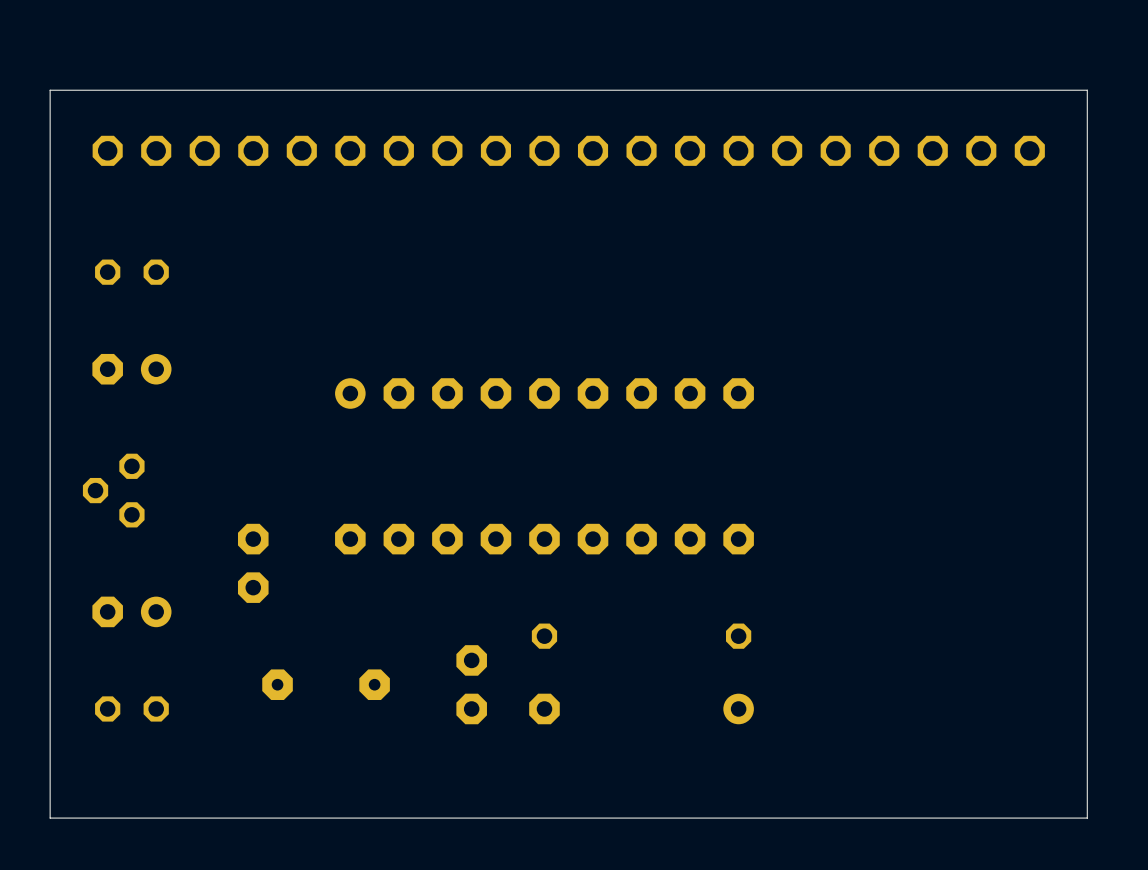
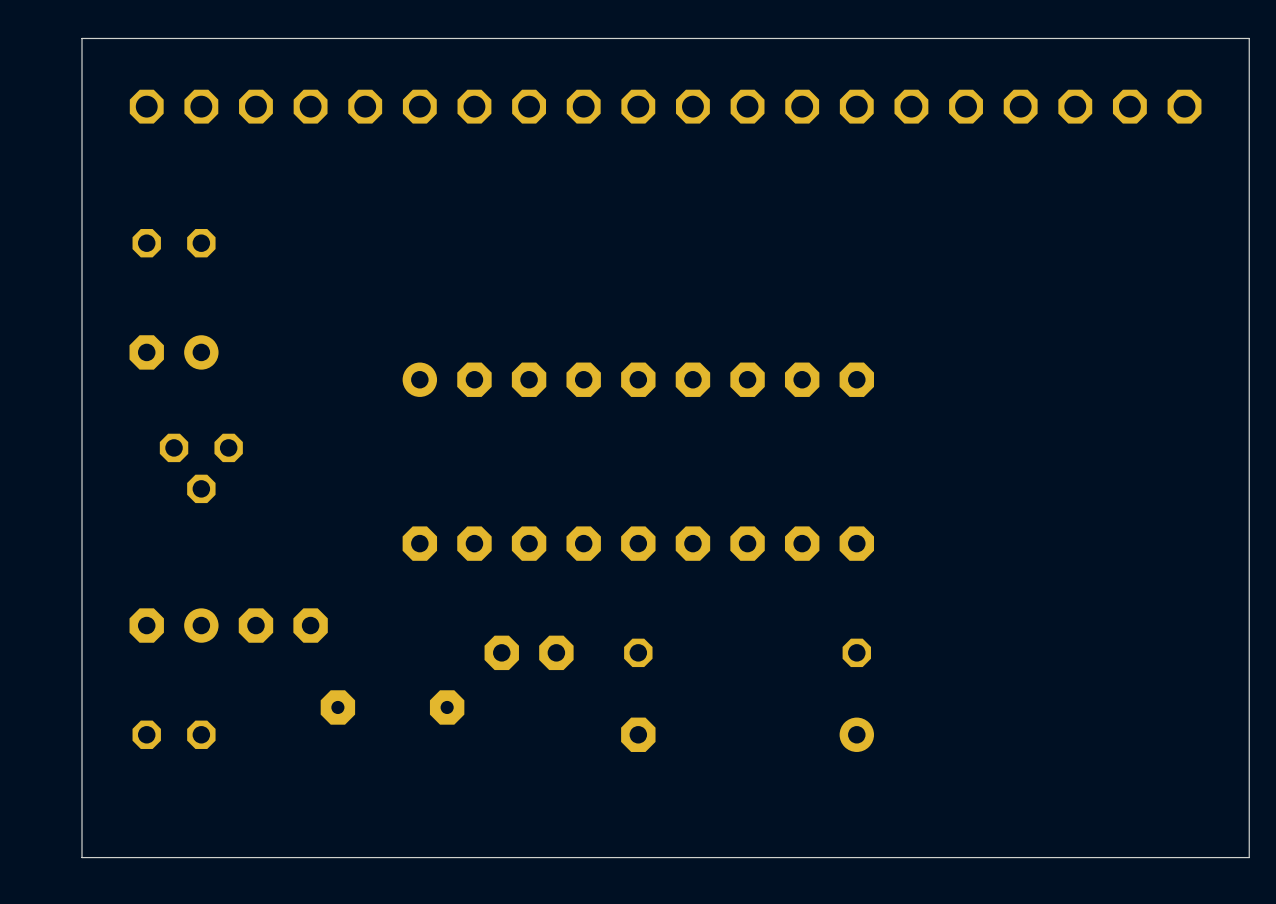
part rotation: 0° (113, 490) -> 90° counterclockwise (201, 468)
part position: (113, 490) -> (201, 468)
part rotation: 0° (253, 563) -> 90° clockwise (283, 625)
part position: (253, 563) -> (283, 625)
part rotation: 0° (471, 684) -> 90° clockwise (529, 652)
part position: (471, 684) -> (529, 652)

